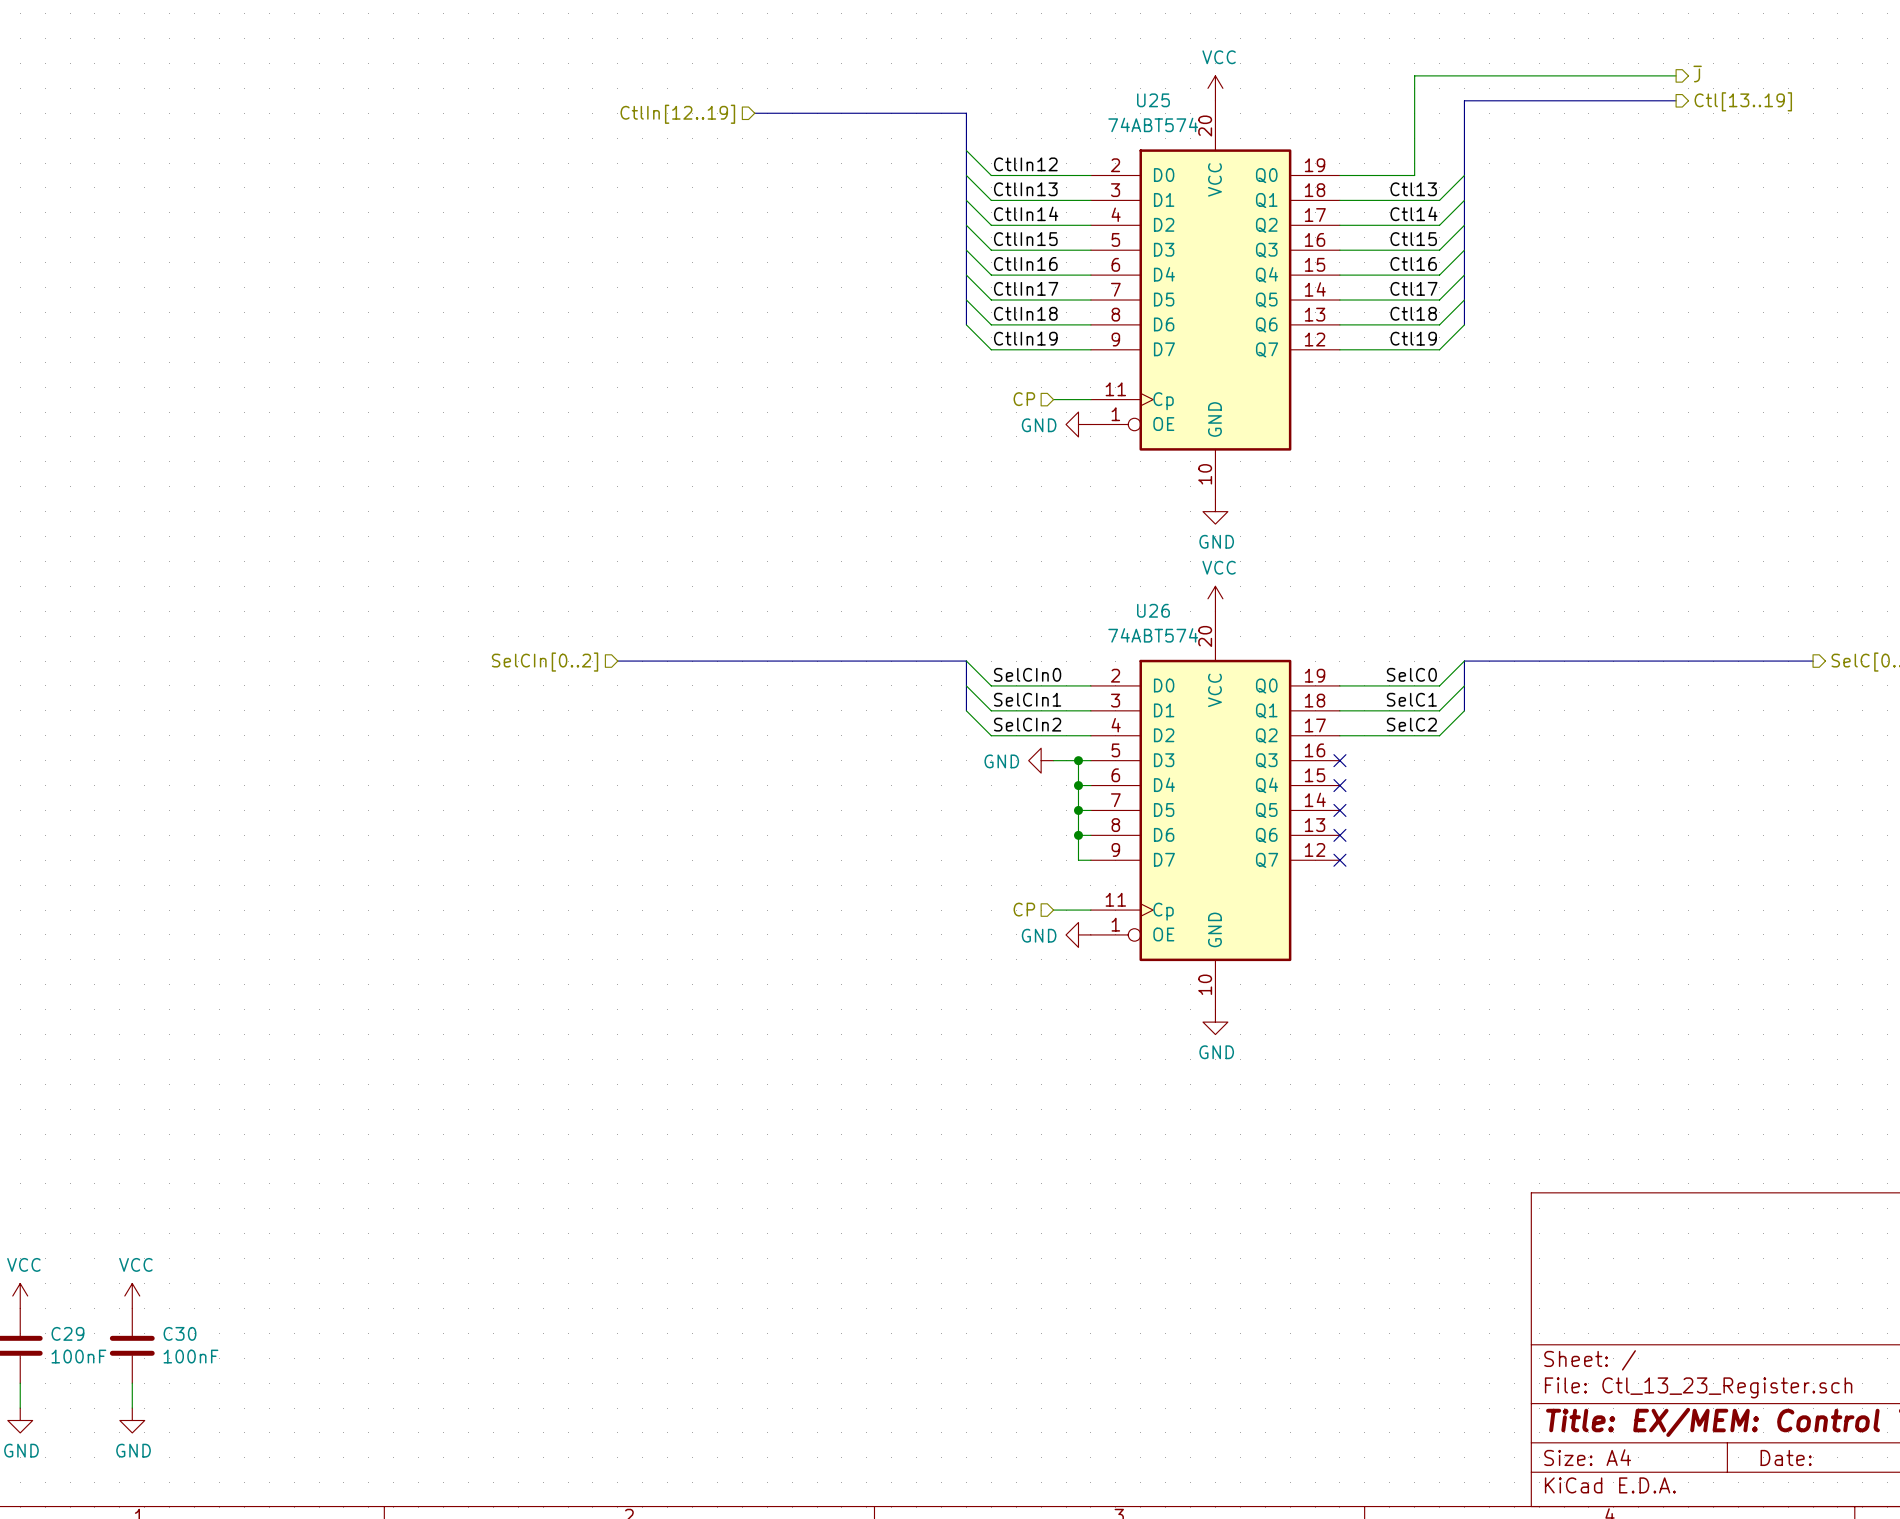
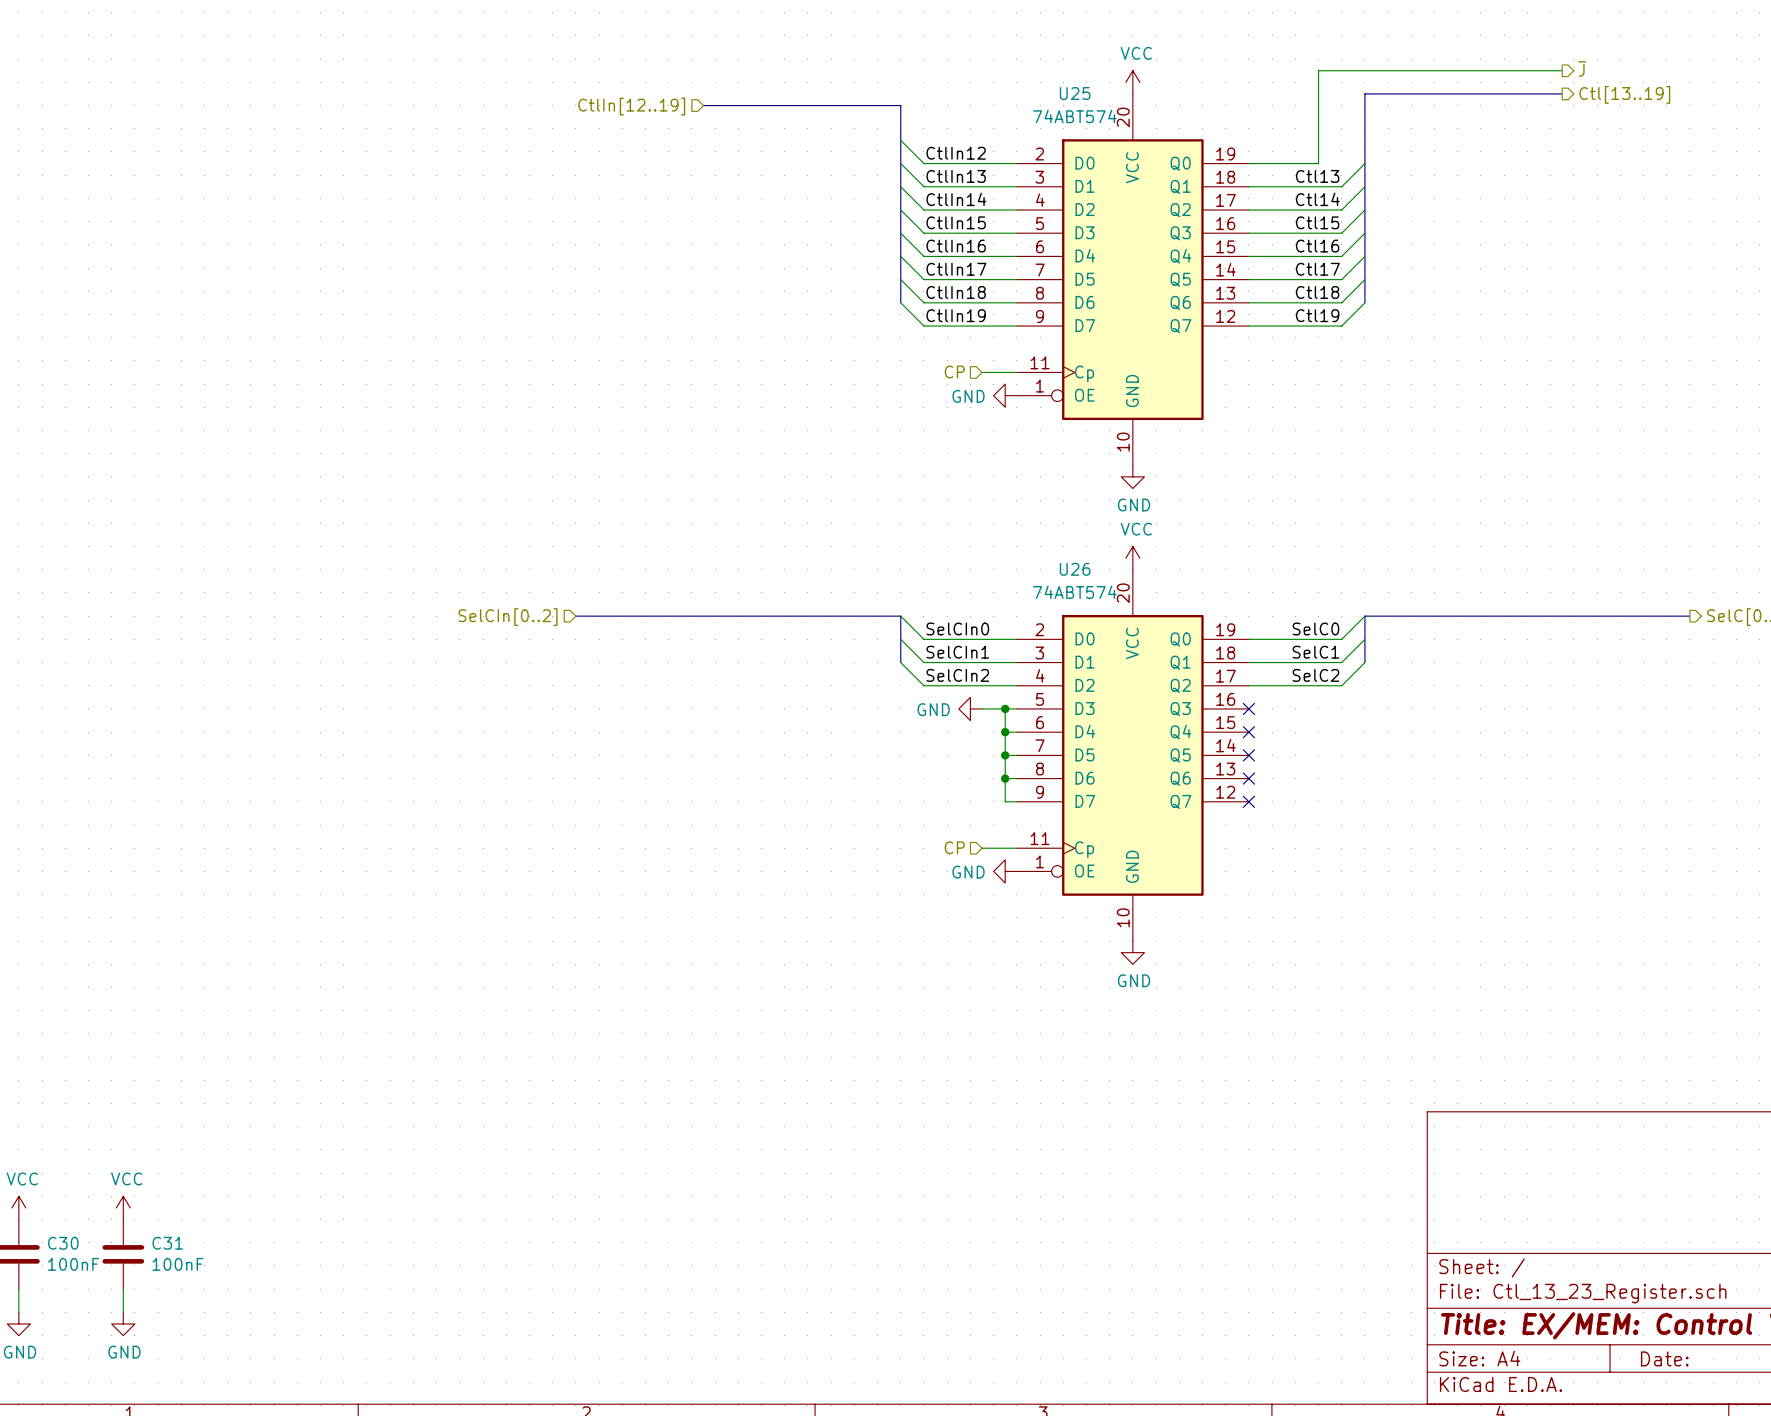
C29 name: C29 (67, 1333) -> C30 (63, 1243)
C30 name: C30 (179, 1333) -> C31 (167, 1243)

